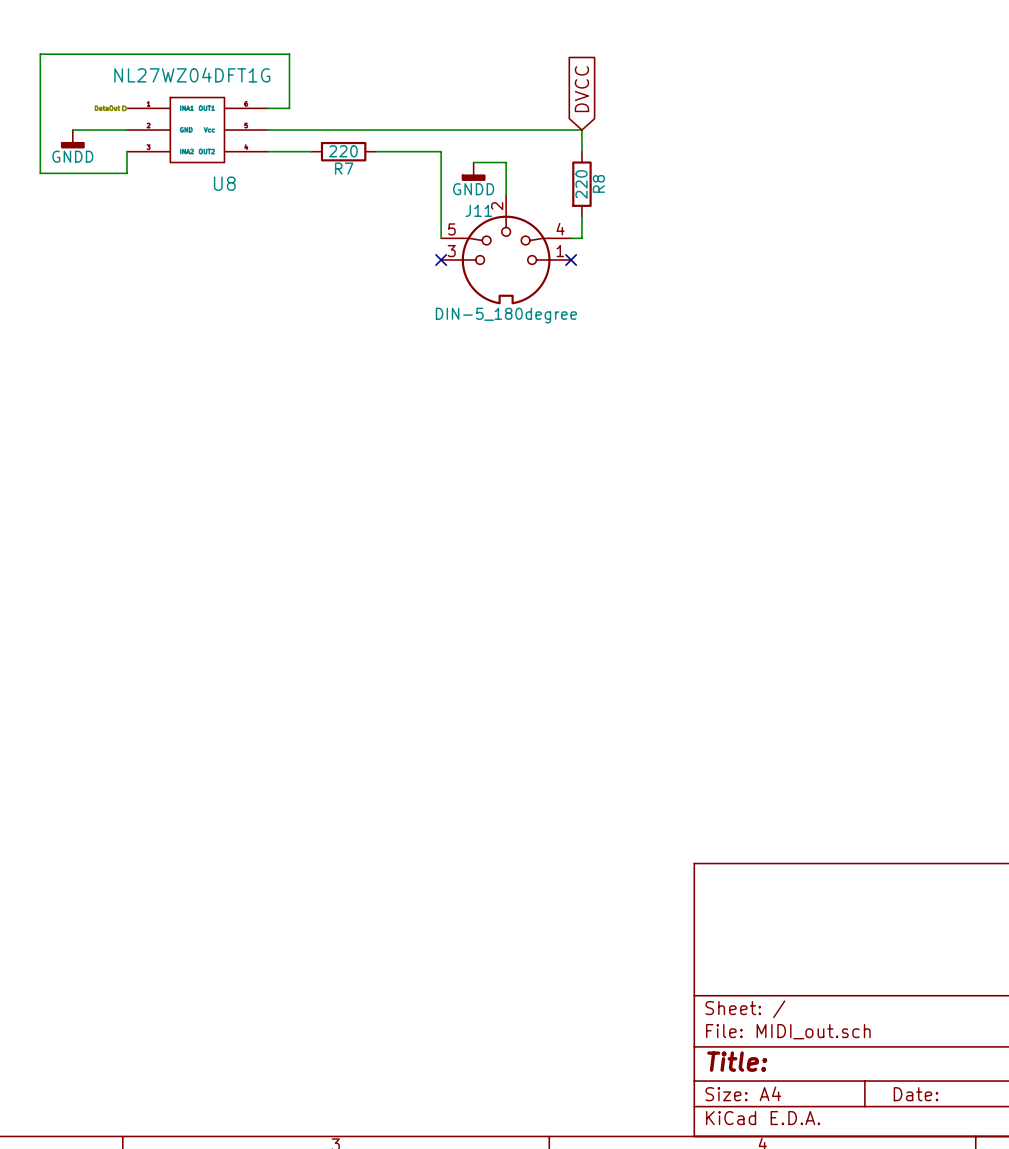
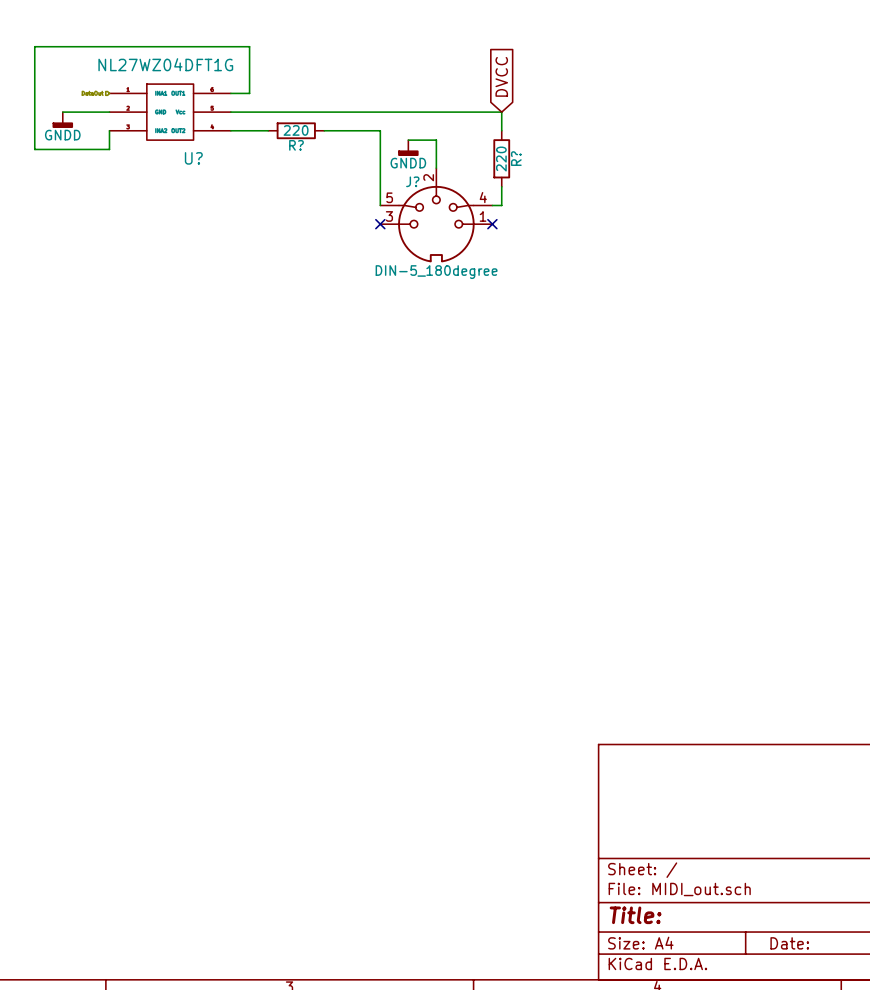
R7 name: R7 (344, 168) -> R? (296, 145)
U8 name: U8 (224, 183) -> U? (193, 158)
R8 name: R8 (598, 183) -> R? (516, 158)
J11 name: J11 (478, 210) -> J? (412, 181)

